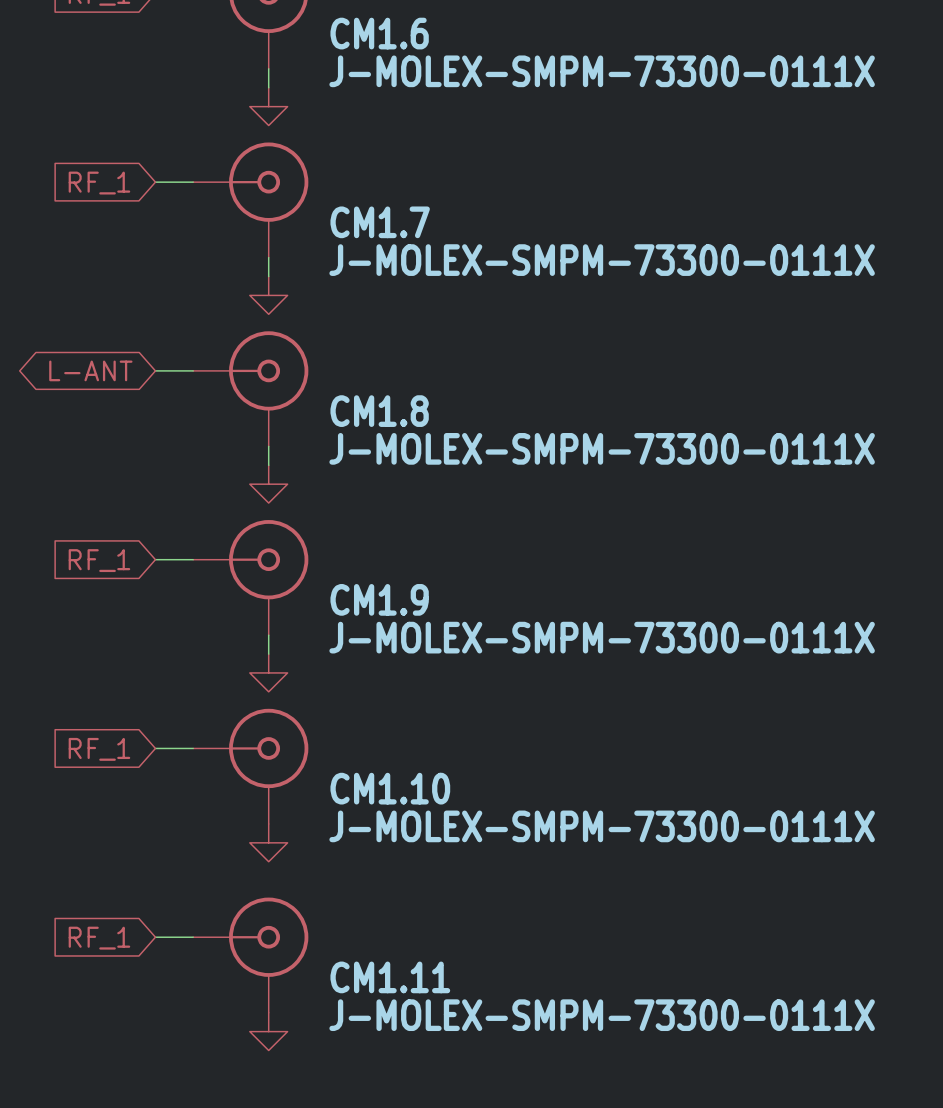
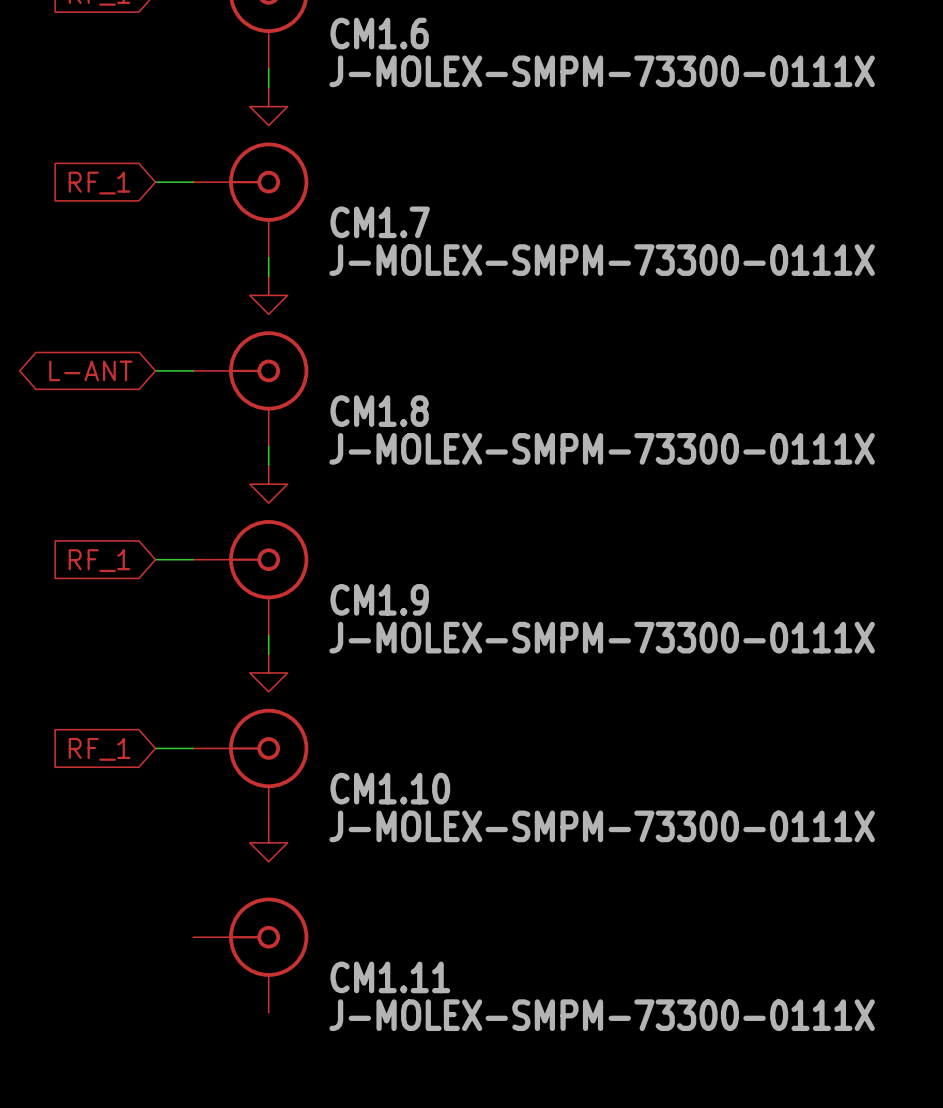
wire: (155, 937) (193, 937) -> none
global label: RF_1 (99, 938) -> none
power symbol: (268, 1031) -> none

